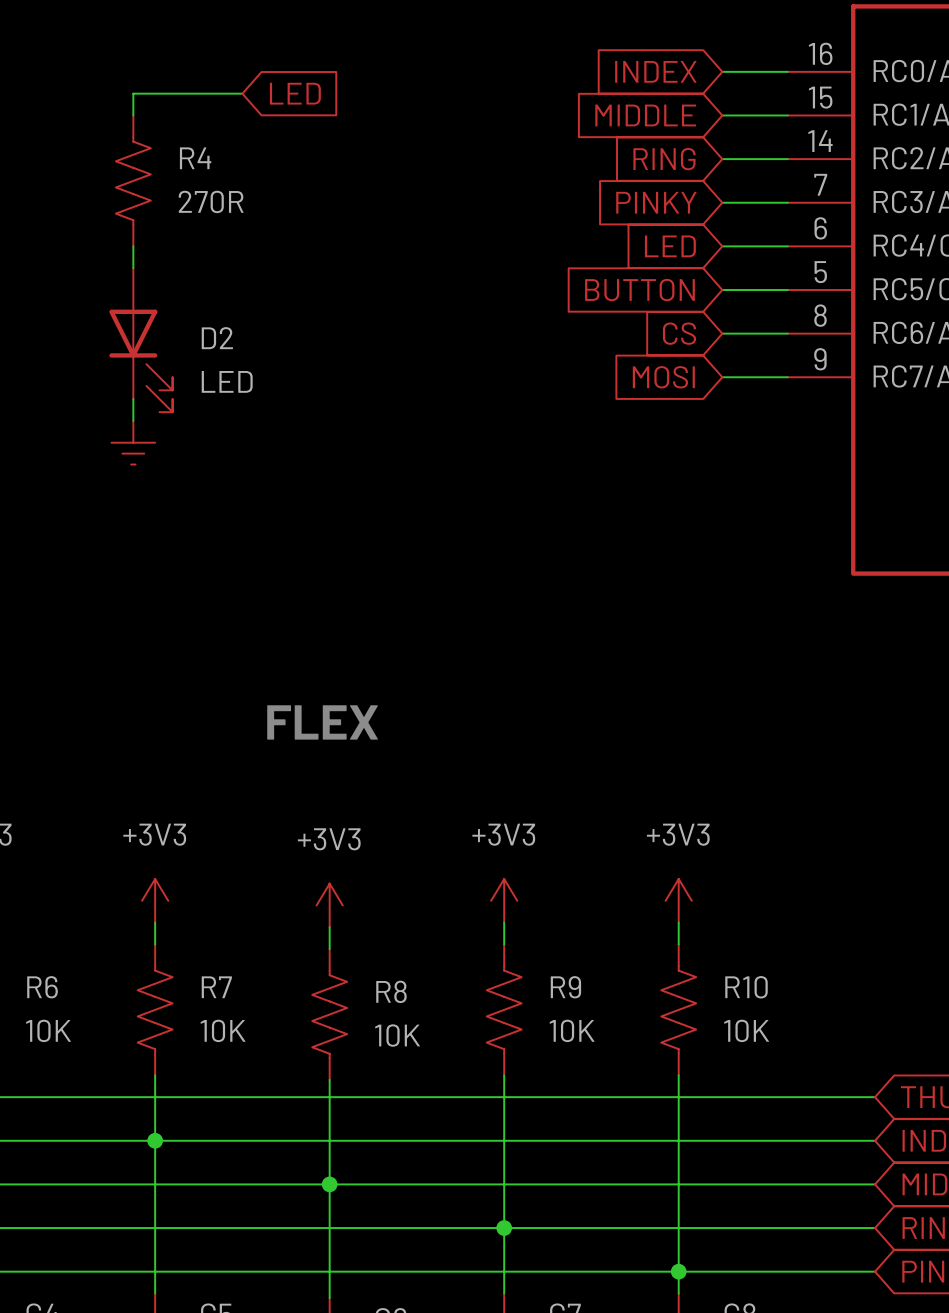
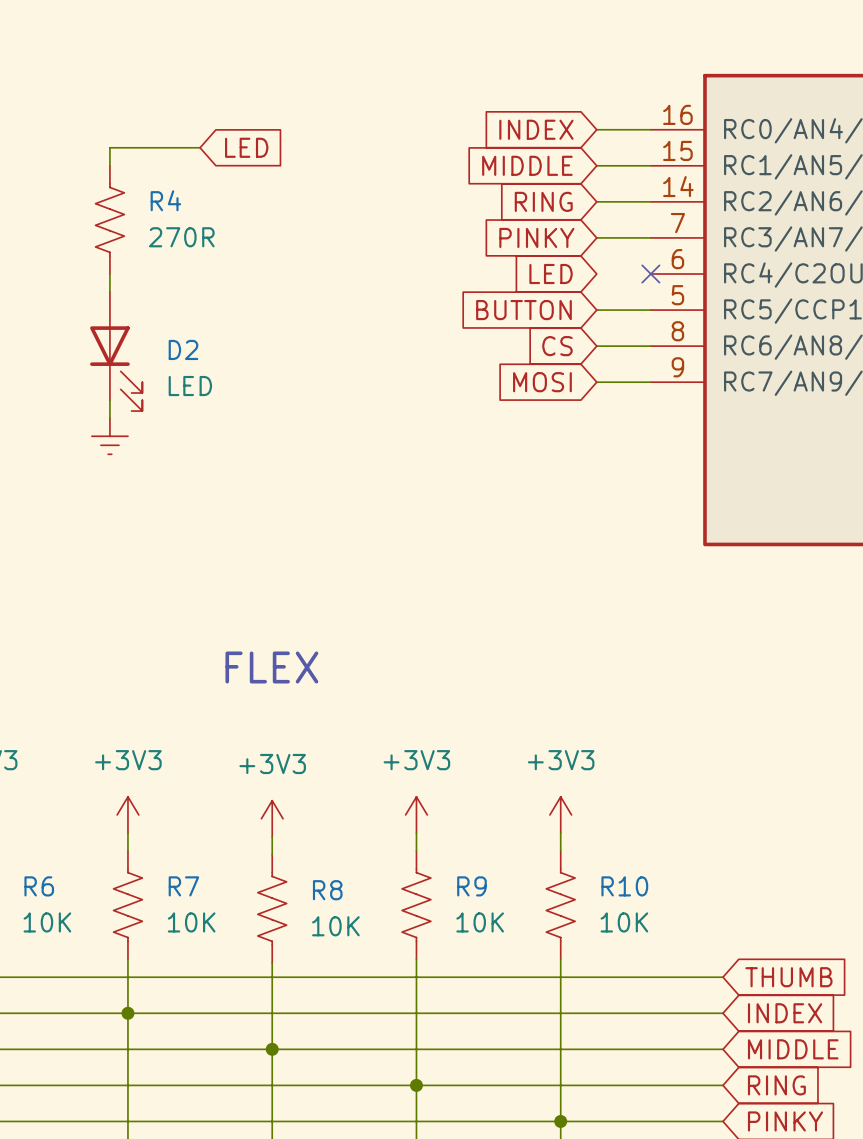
wire: (722, 246) (787, 246) -> none
no-connect mark: none -> (650, 274)

